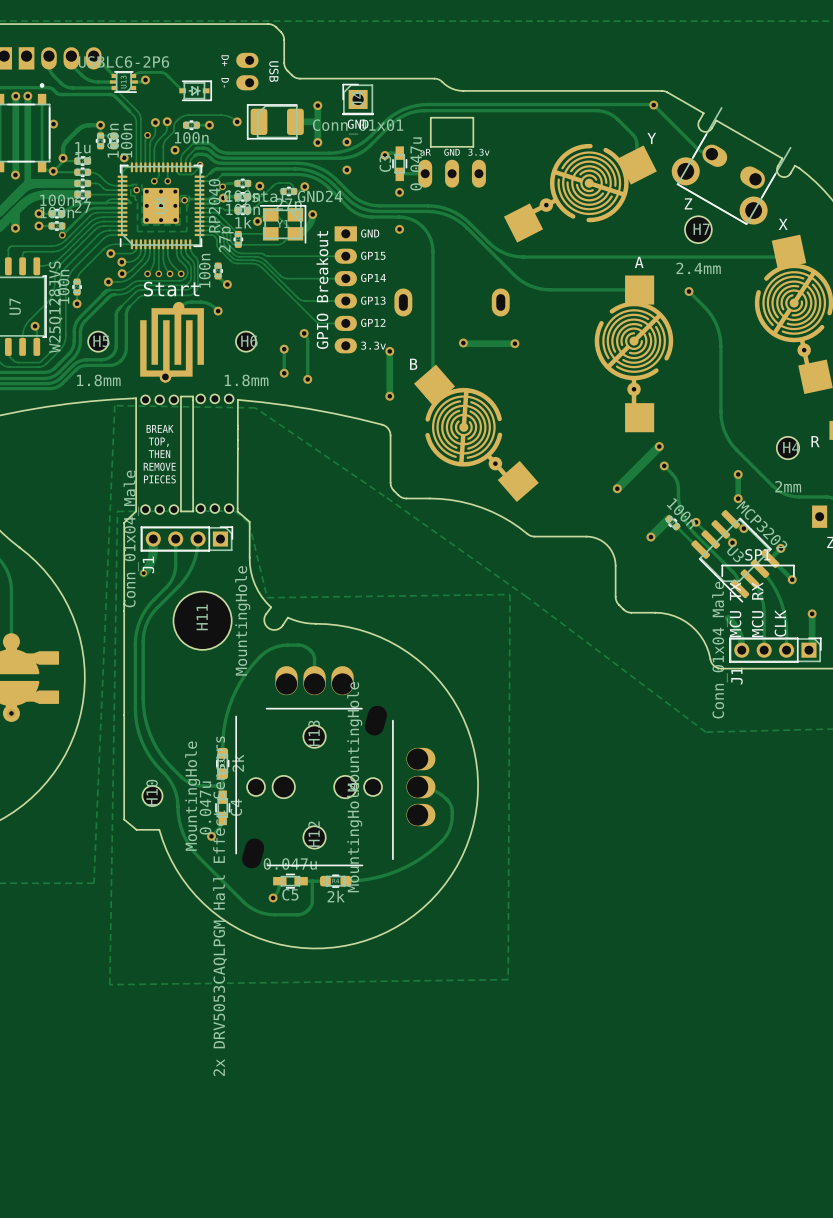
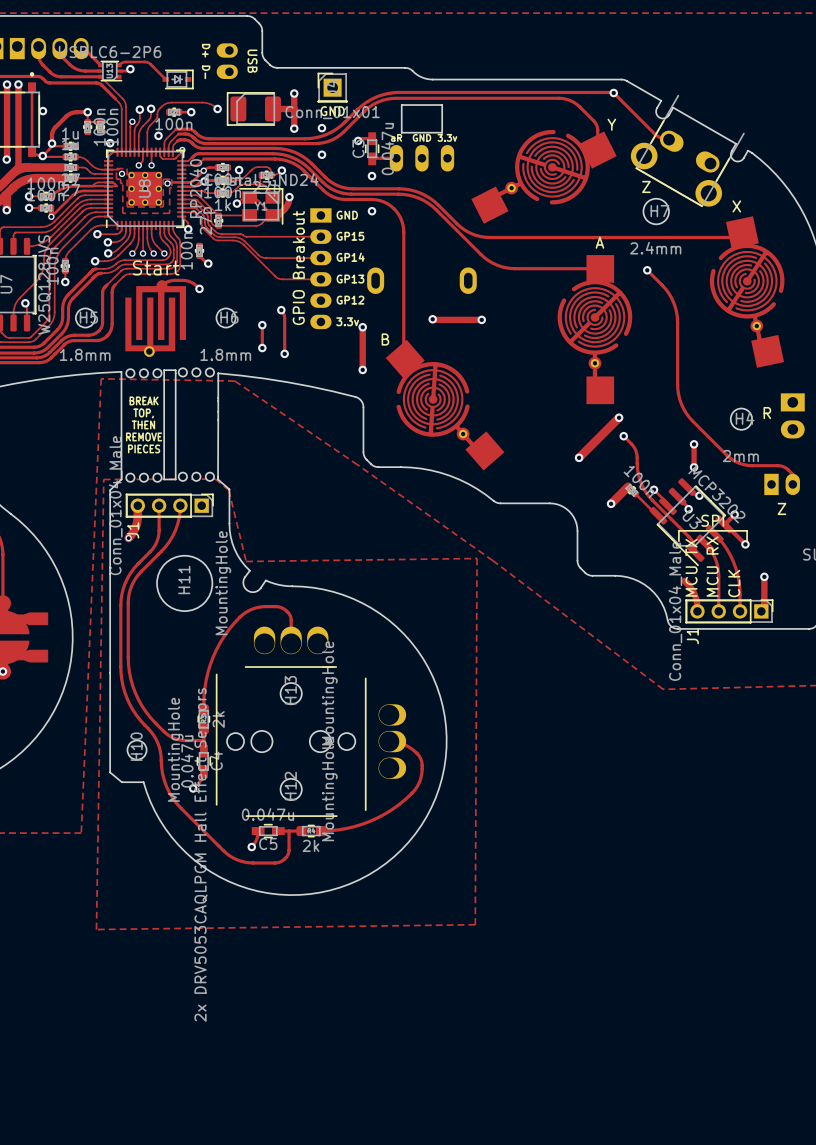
track: (199, 234) (214, 235) (217, 248) (232, 262) (253, 263) (260, 266) (316, 321) (340, 323) (345, 329) -> (181, 216) (188, 222) (188, 229)
via: none -> (188, 229)

